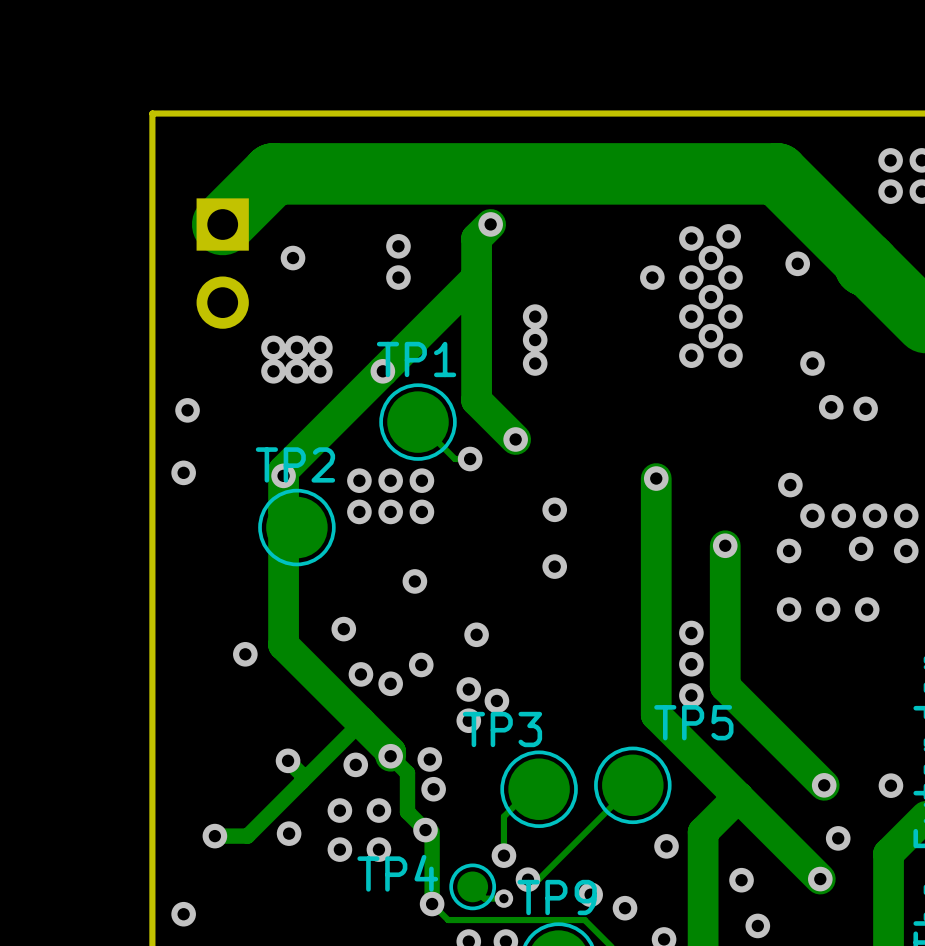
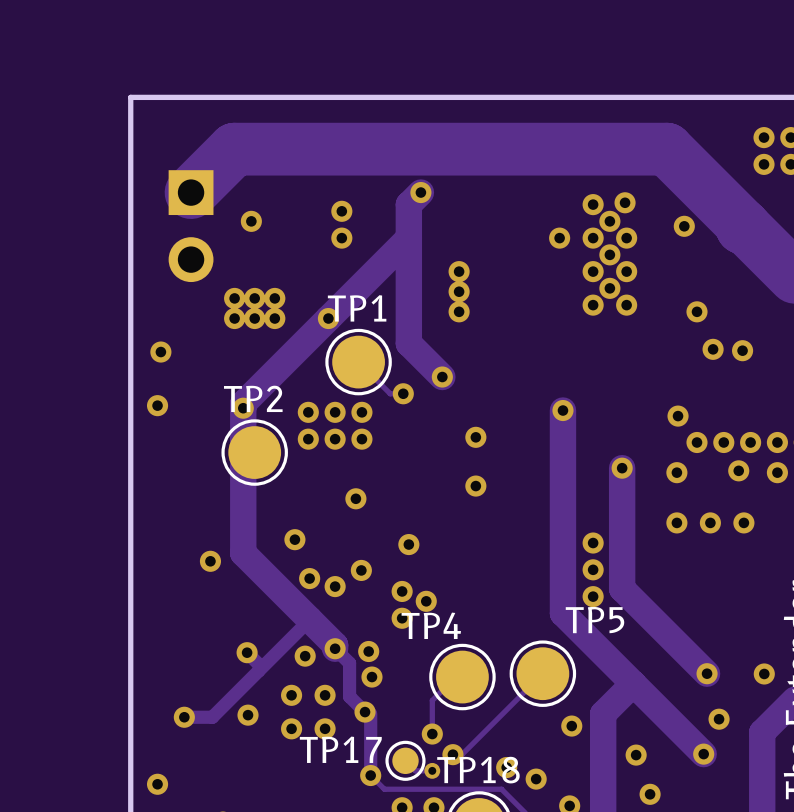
TP3 name: TP3 (502, 729) -> TP4 (431, 625)
TP4 name: TP4 (397, 873) -> TP17 (340, 749)
TP9 name: TP9 (557, 897) -> TP18 (478, 770)

